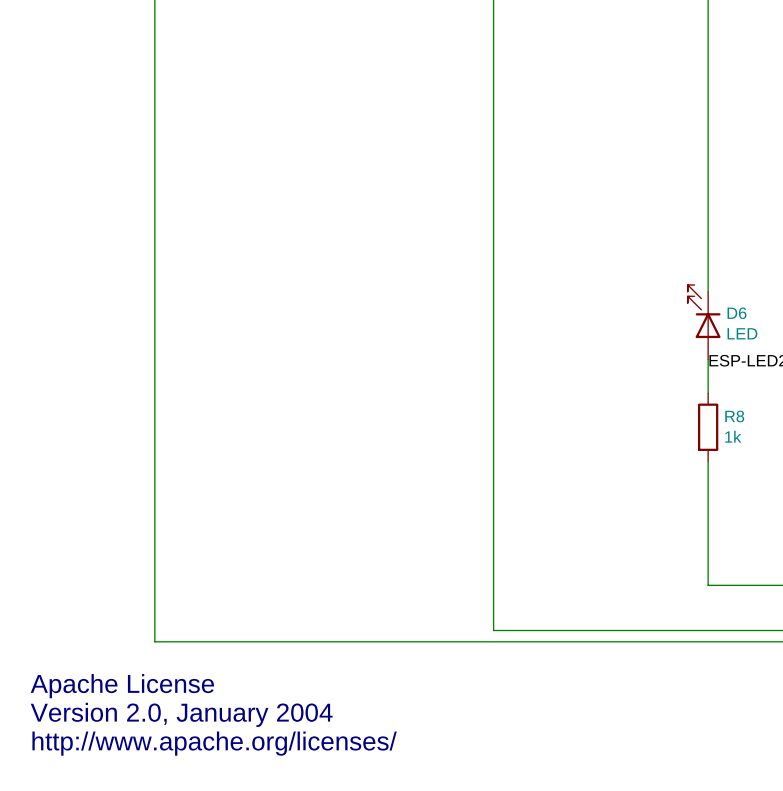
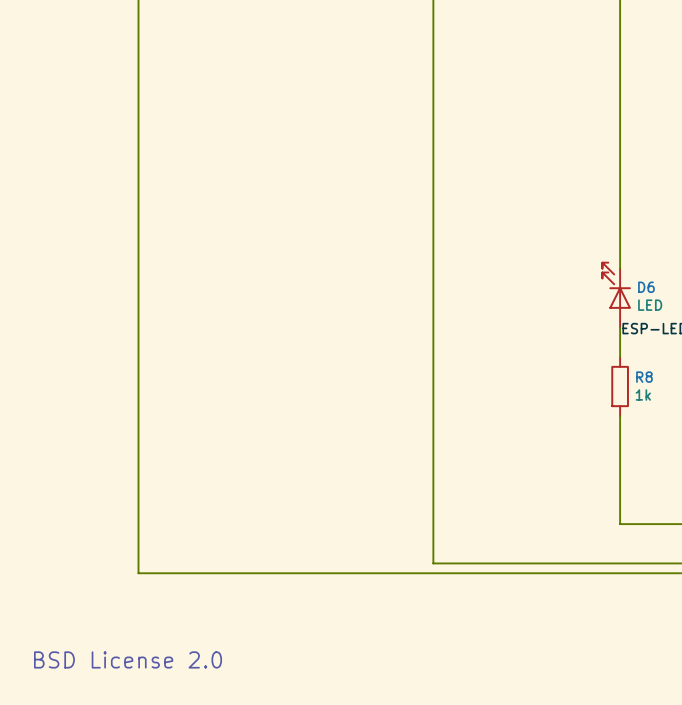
text: Apache License (122, 686) -> none
text: Version 2.0, January 2004 (181, 714) -> none
text: http://www.apache.org/licenses/ (214, 743) -> BSD License 2.0 (128, 659)

